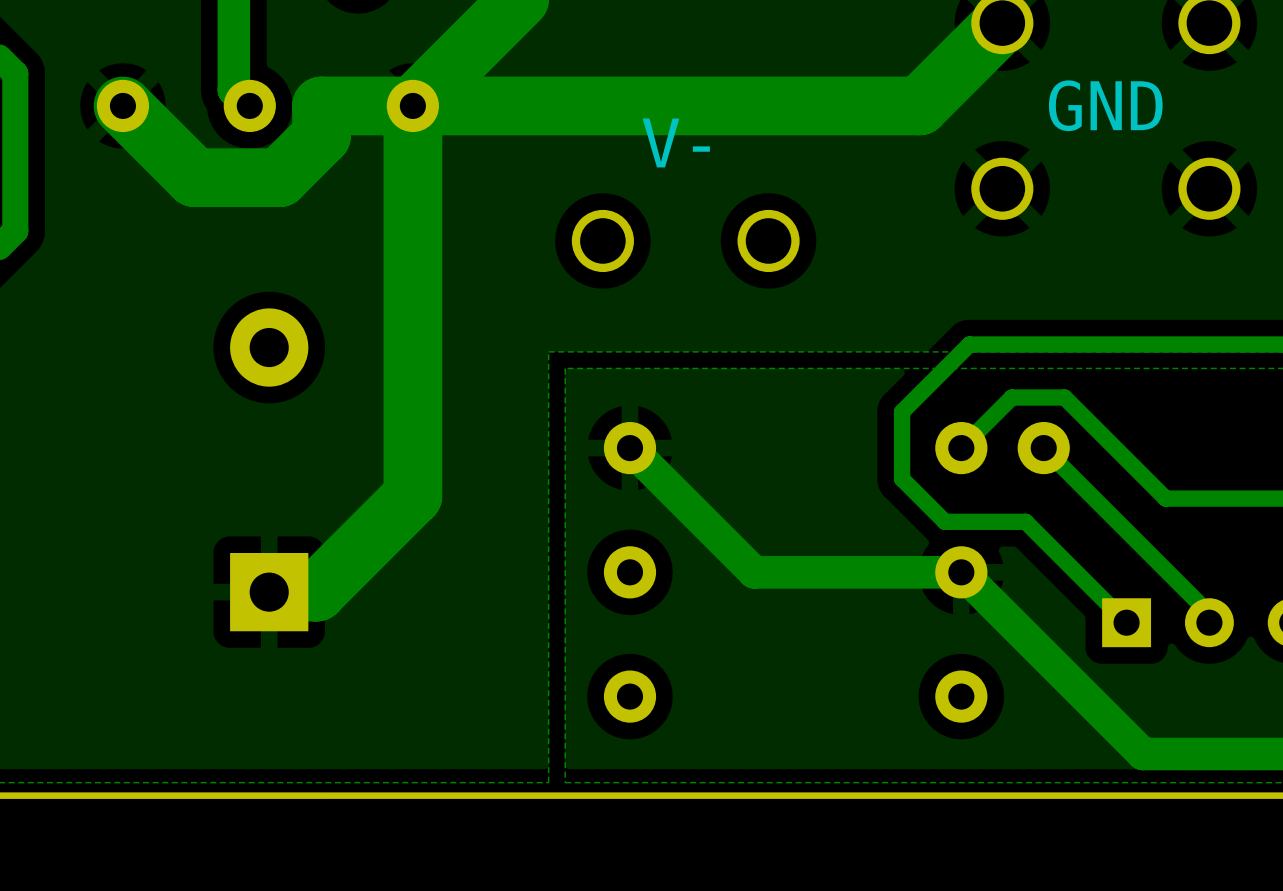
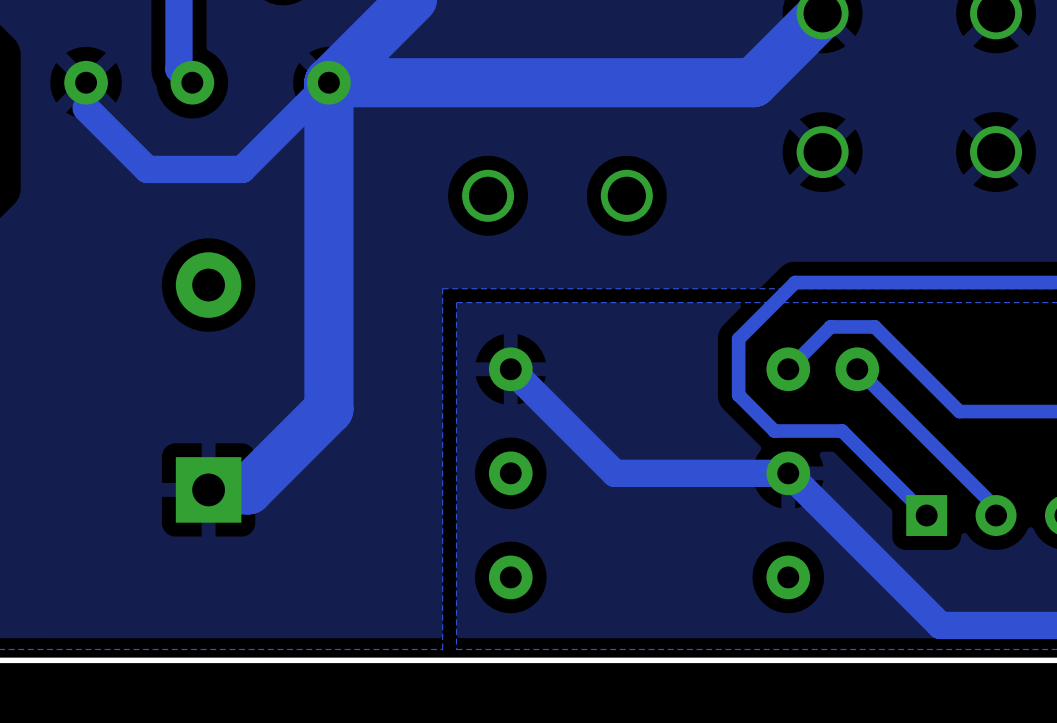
track: (412, 105) (321, 105) (321, 135) (279, 177) (194, 177) (122, 105) -> (328, 82) (242, 169) (147, 169) (86, 108) (86, 82)
text: GND (1105, 105) -> none
text: V- (676, 142) -> none

